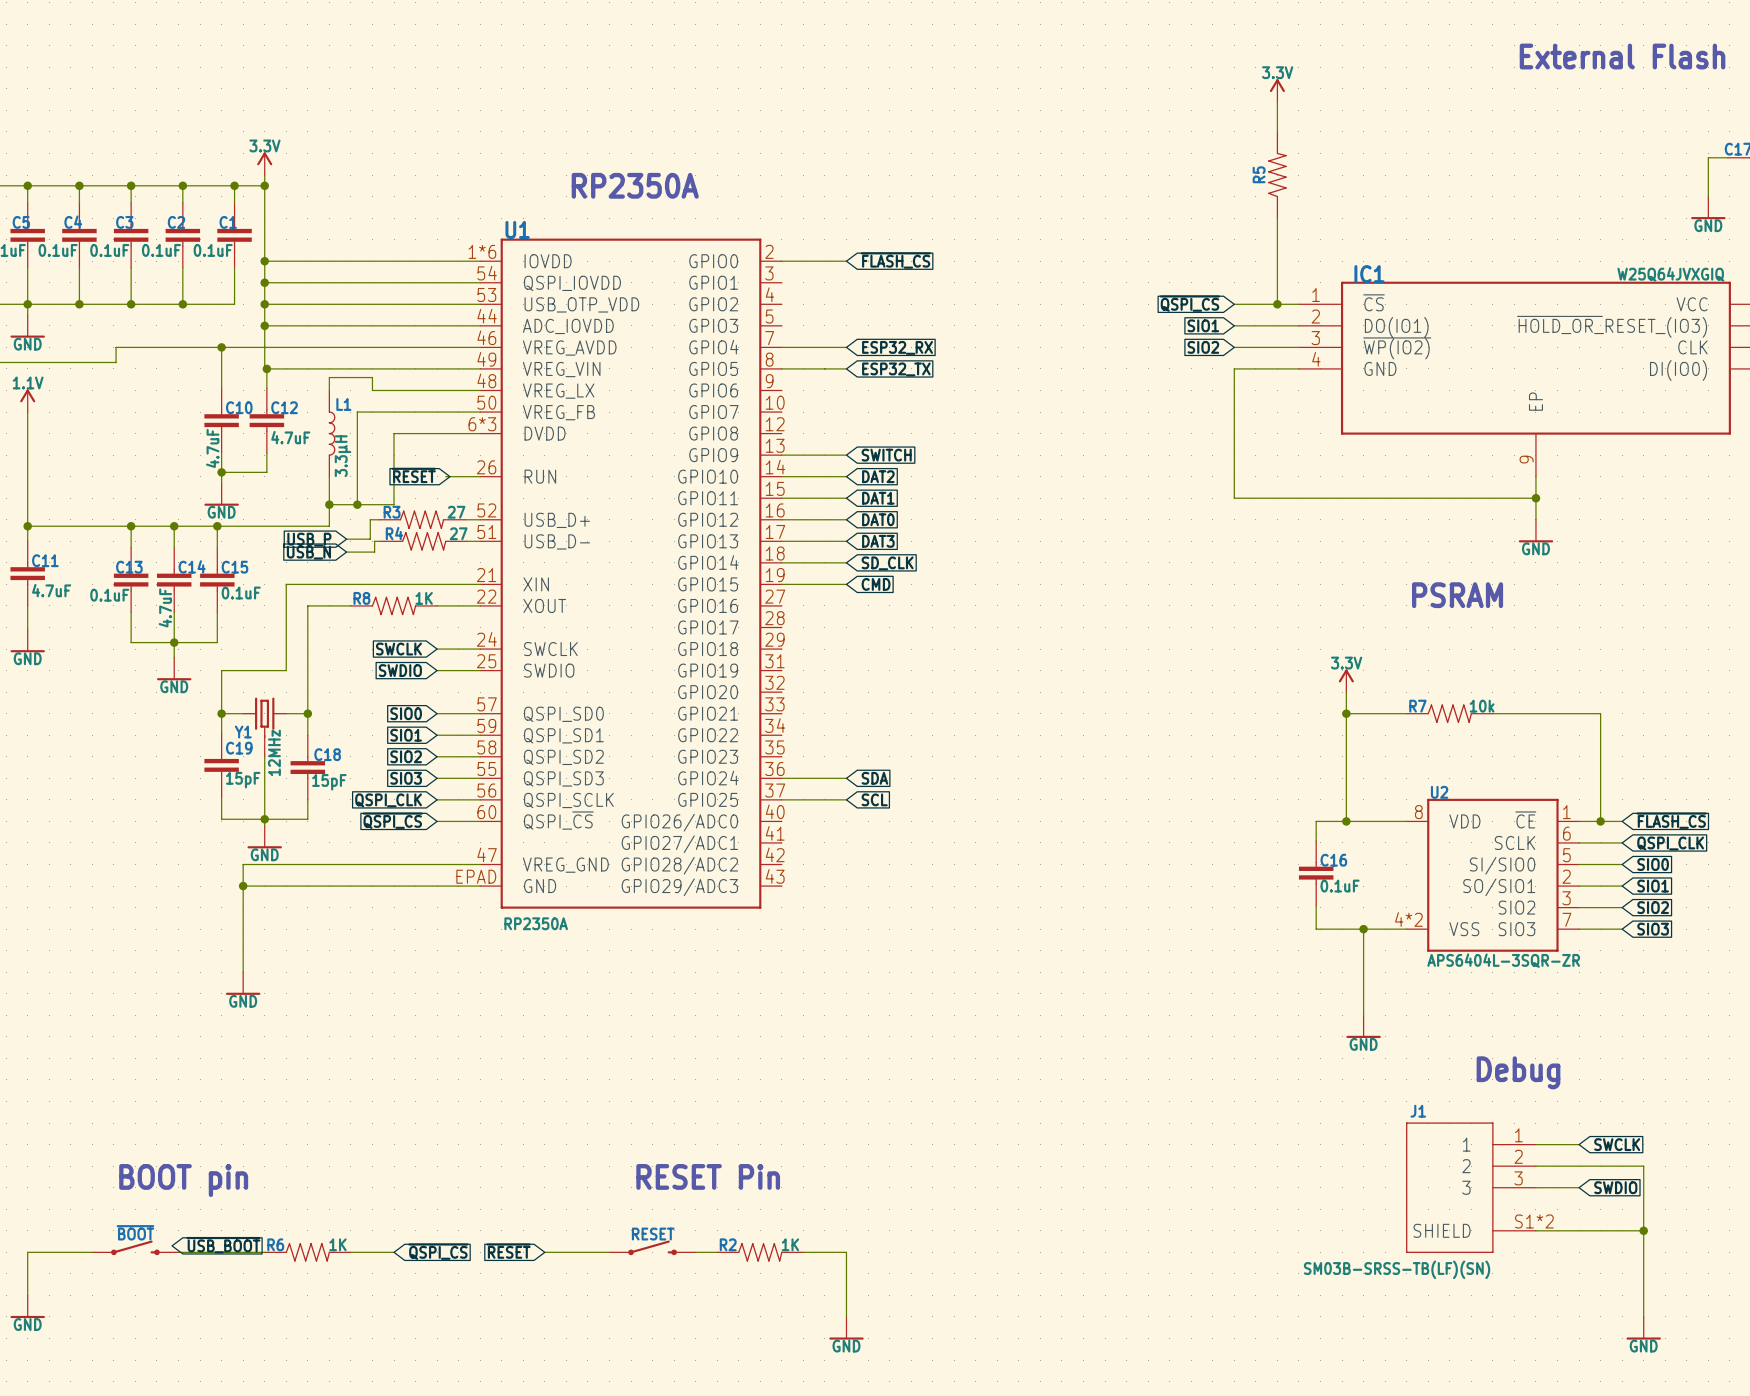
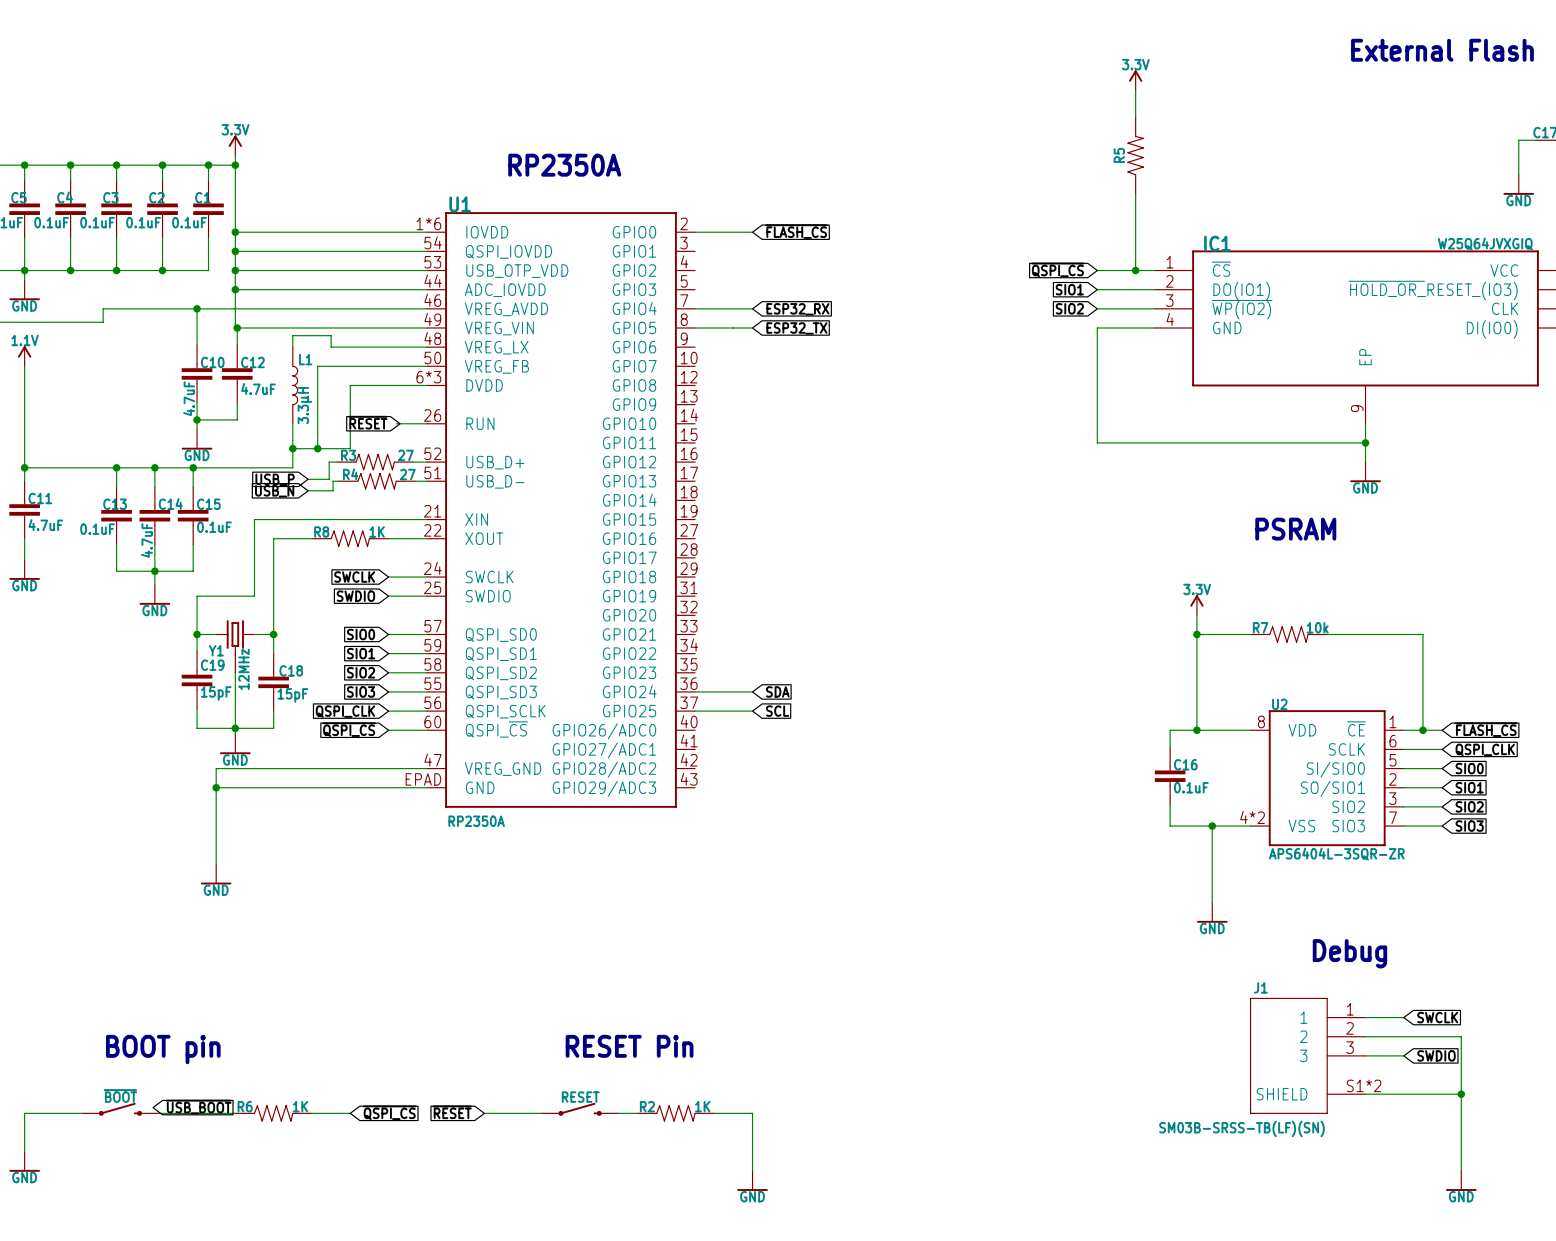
wire: (781, 455) (846, 455) -> none
global label: SWITCH (886, 455) -> none
wire: (781, 476) (846, 476) -> none
global label: DAT2 (878, 476) -> none
wire: (781, 498) (846, 498) -> none
global label: DAT1 (878, 498) -> none
wire: (781, 519) (846, 519) -> none
global label: DAT0 (878, 519) -> none
wire: (781, 541) (846, 541) -> none
global label: DAT3 (878, 541) -> none
wire: (781, 562) (846, 562) -> none
global label: SD_CLK (887, 563) -> none
wire: (781, 584) (846, 584) -> none
global label: CMD (876, 584) -> none

